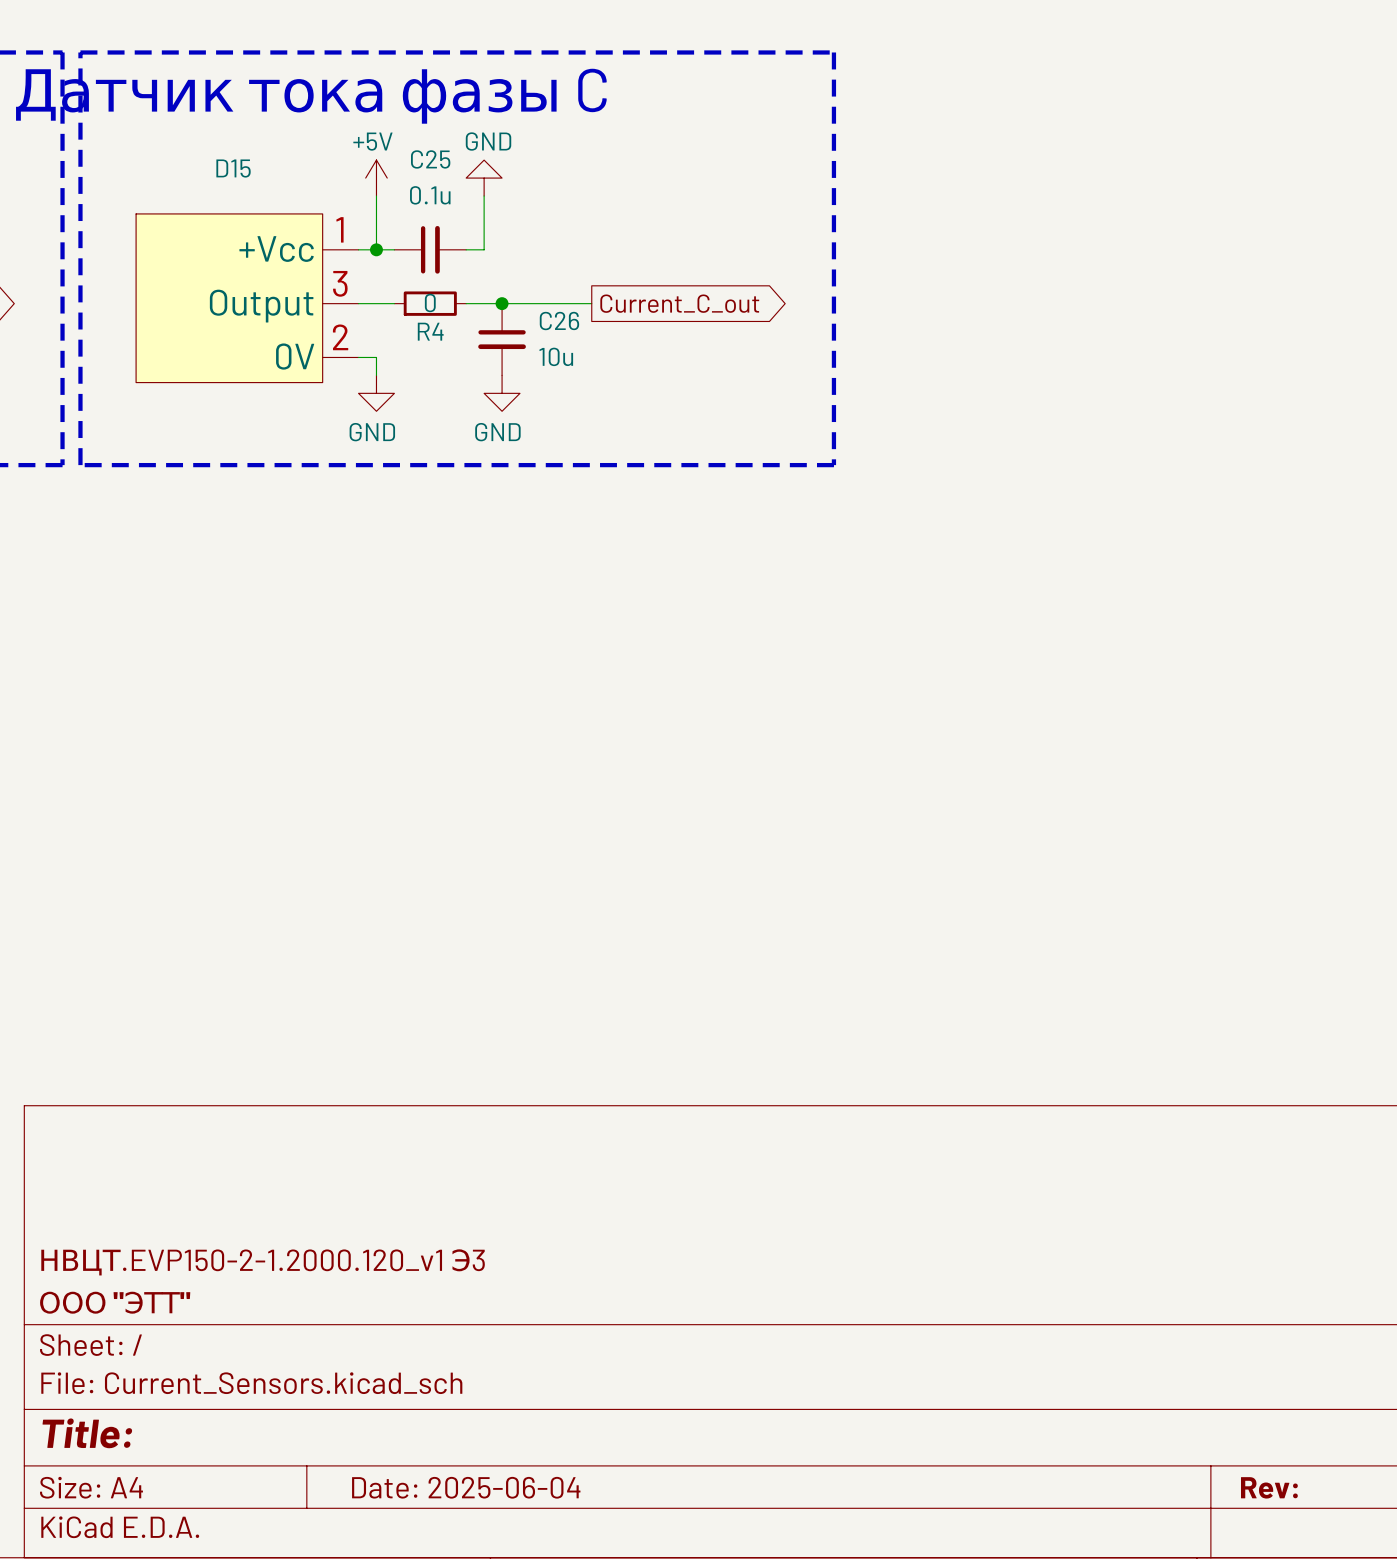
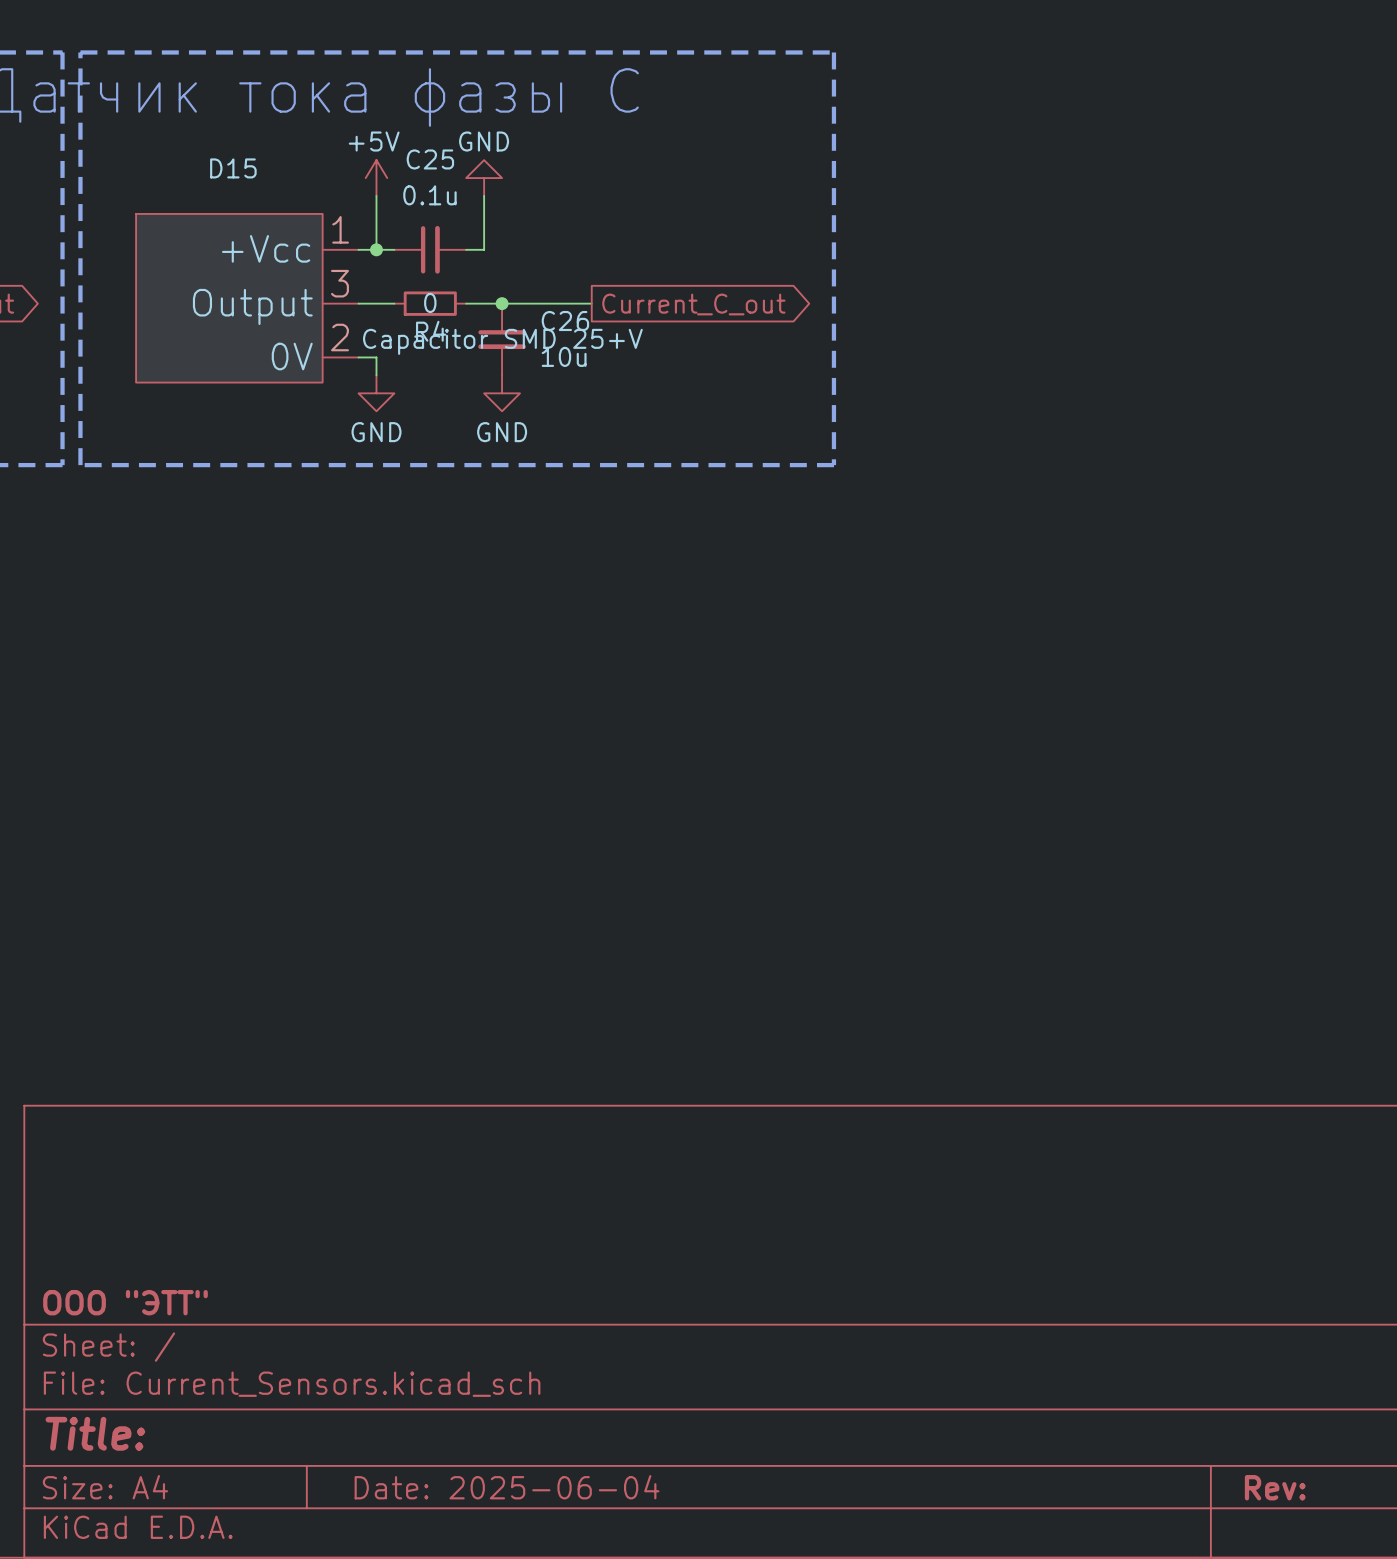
C26 text: none -> Capacitor SMD 25+V (502, 341)
title block: НВЦТ.EVP150-2-1.2000.120_v1 Э3 (263, 1262) -> none

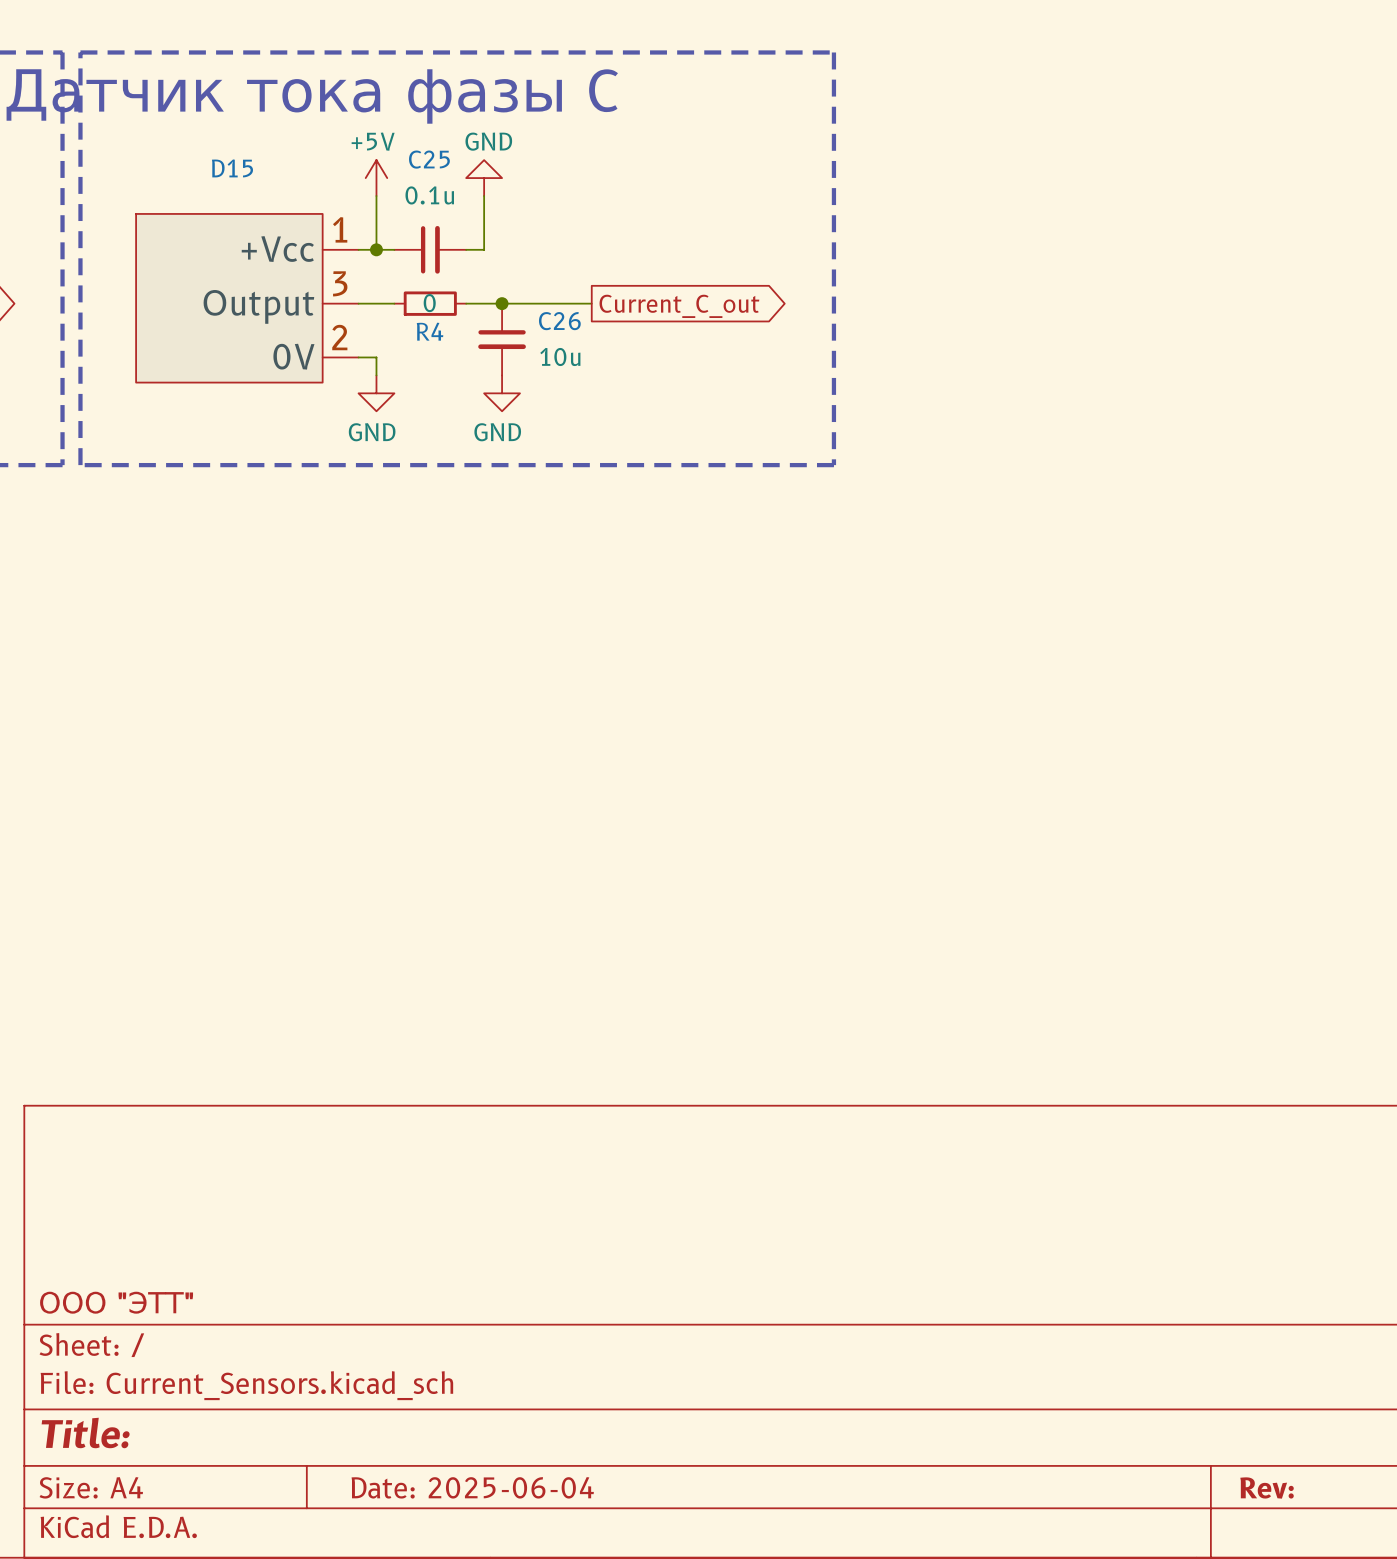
C26 text: Capacitor SMD 25+V (502, 341) -> none

